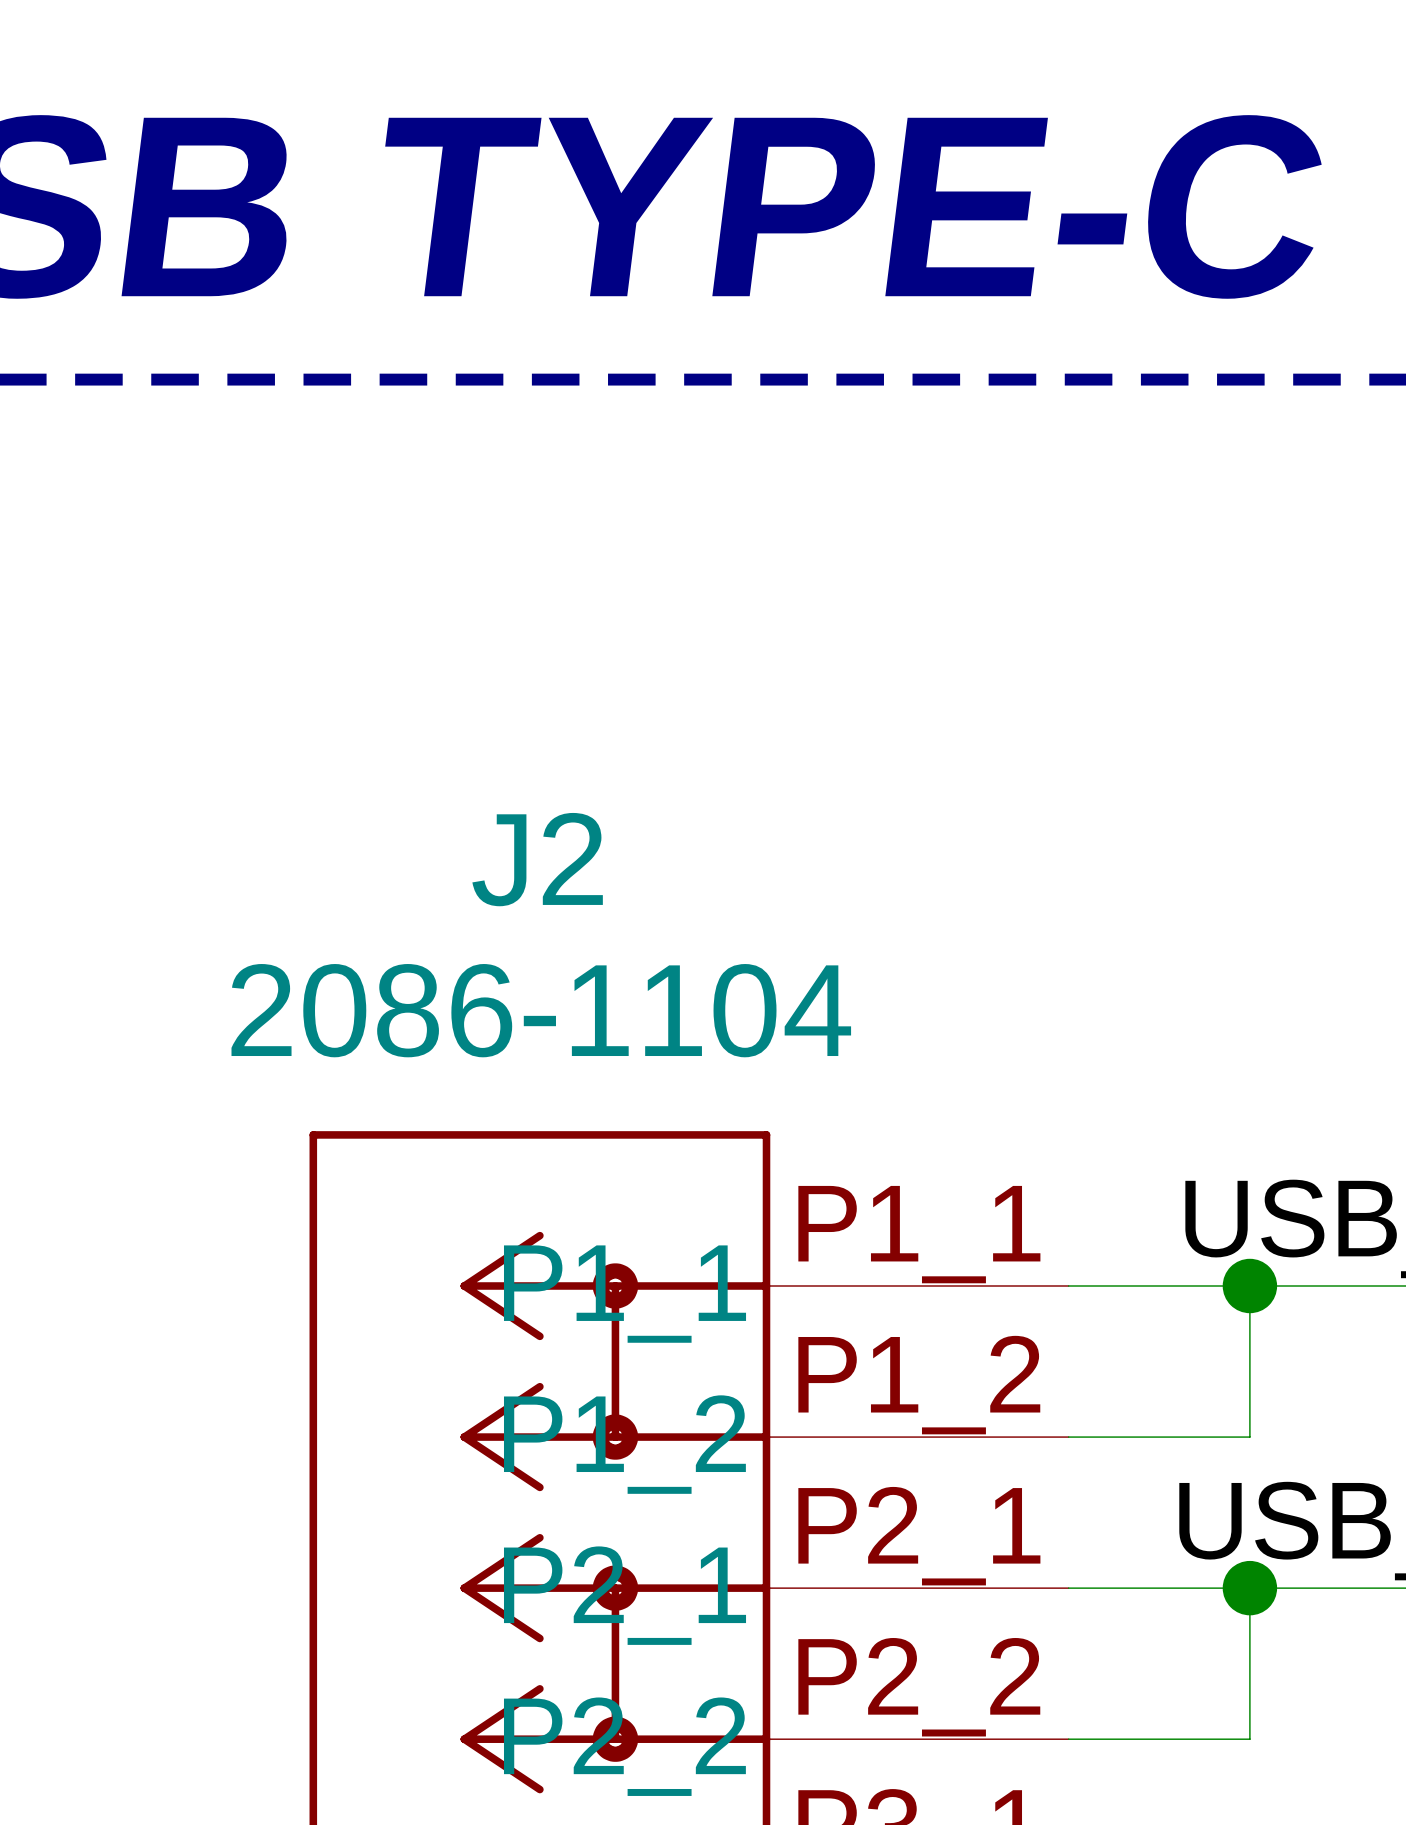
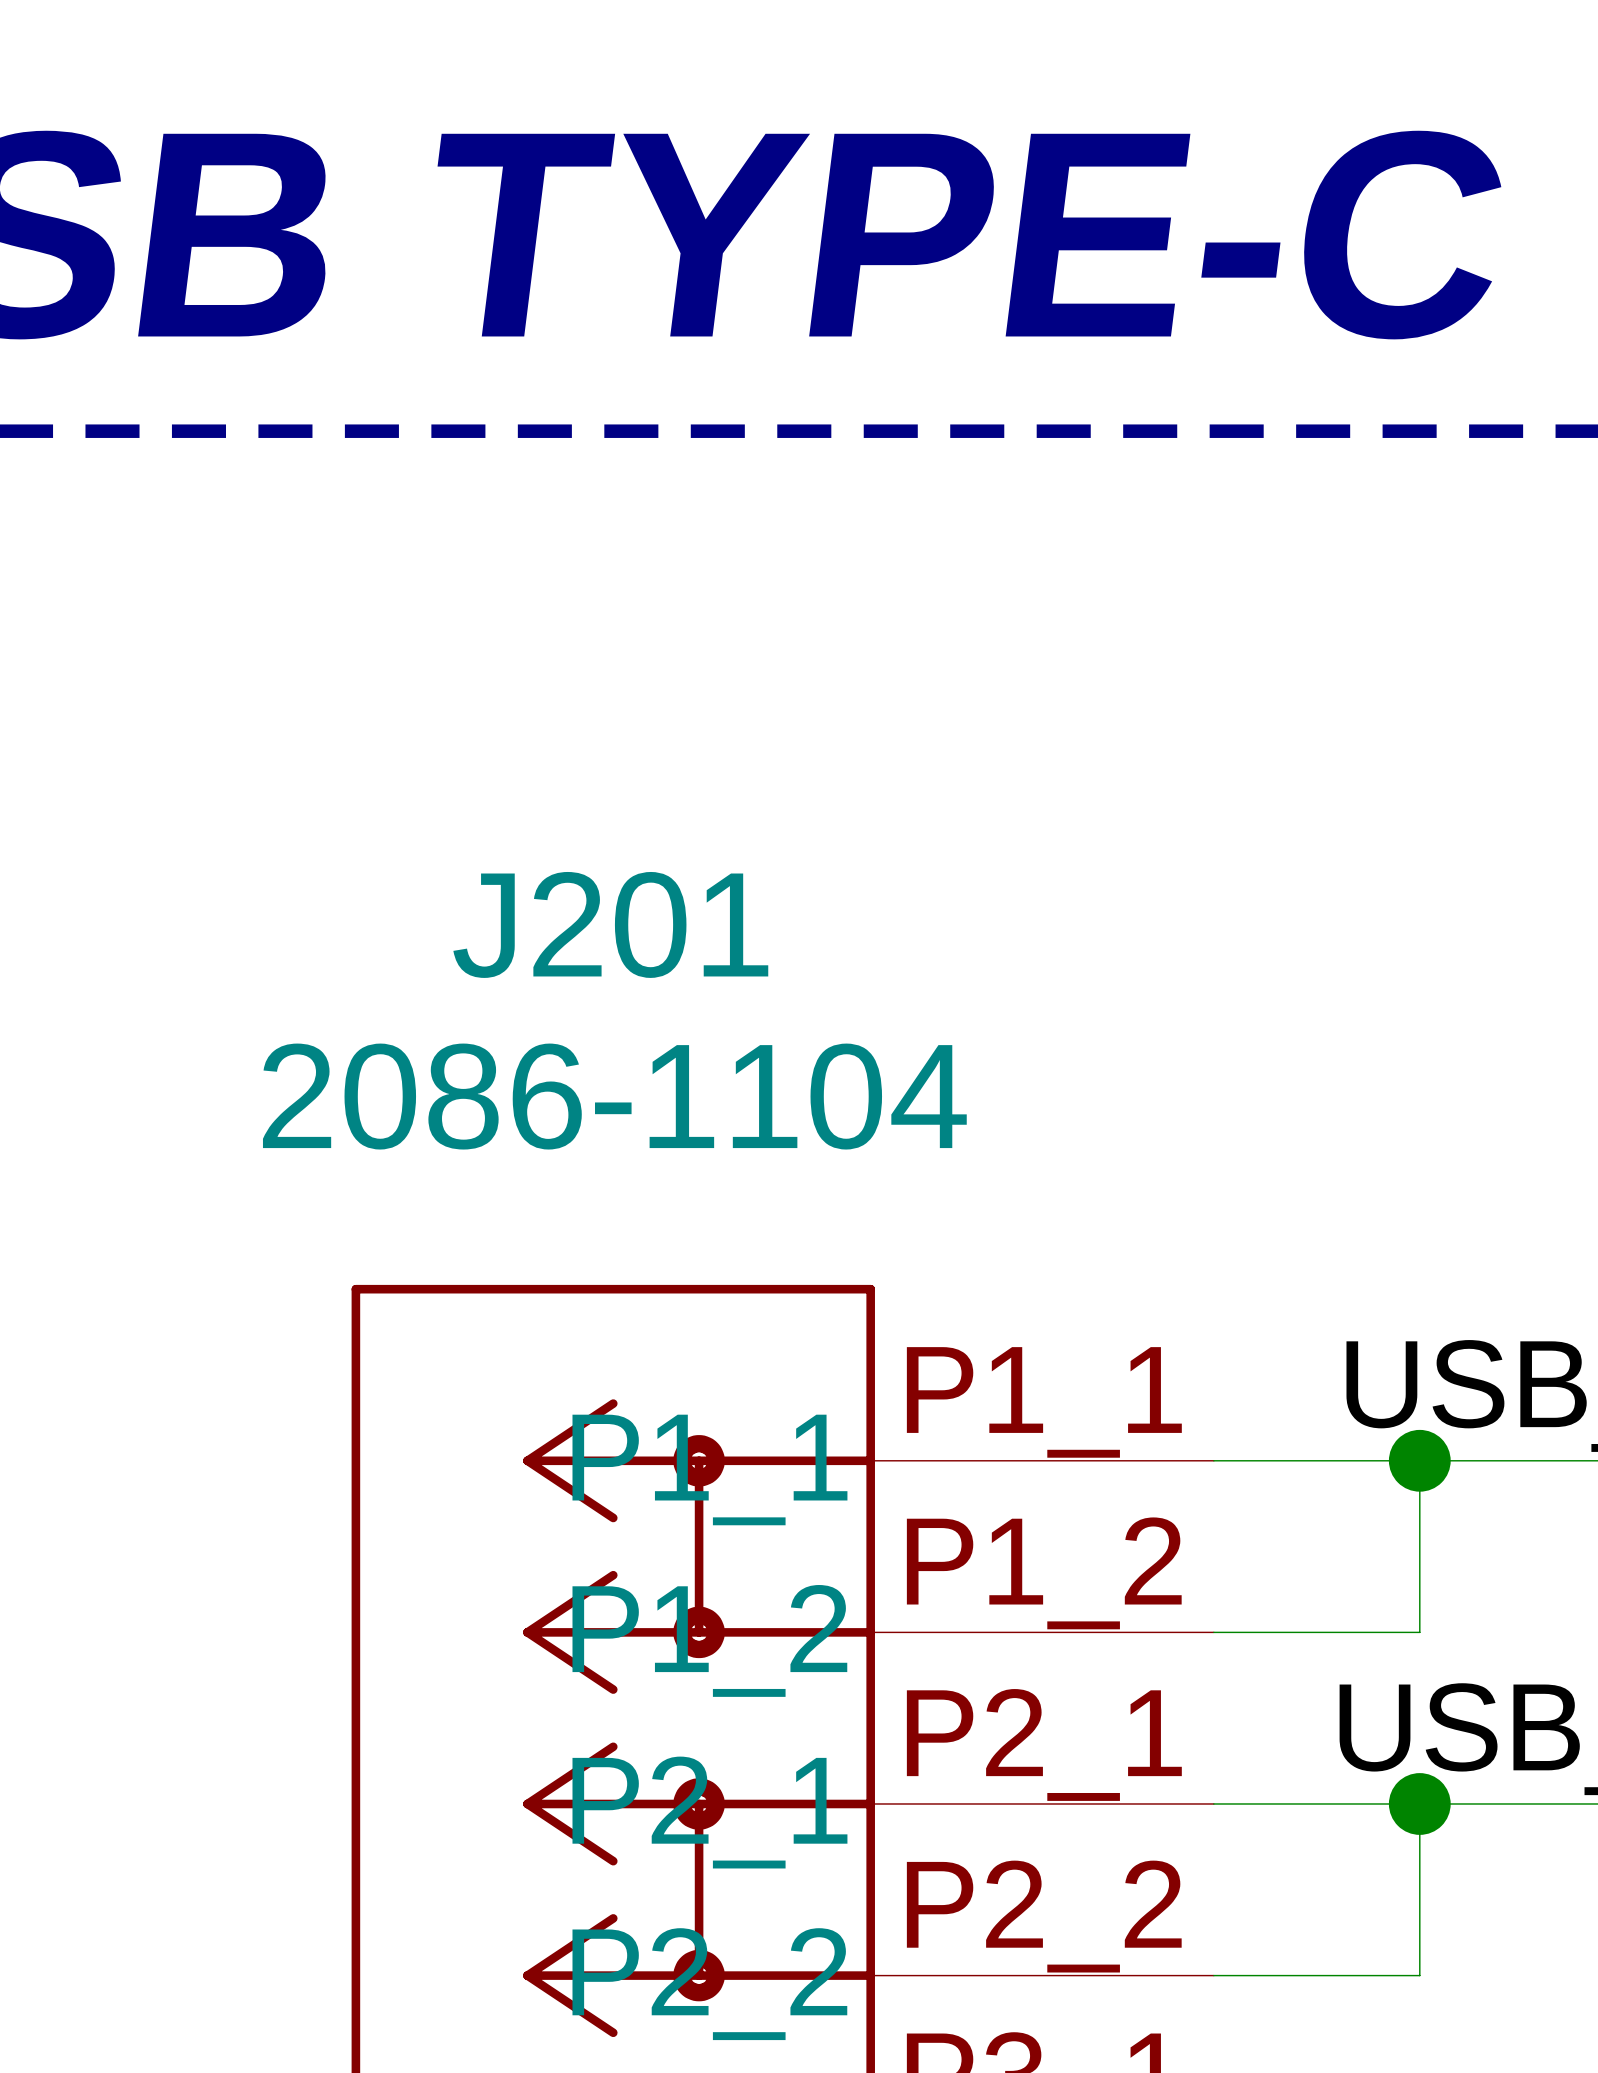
J2 name: J2 (537, 859) -> J201 (610, 924)
J2 value position: 2086-1104 (541, 1010) -> 2086-1104 (614, 1096)

